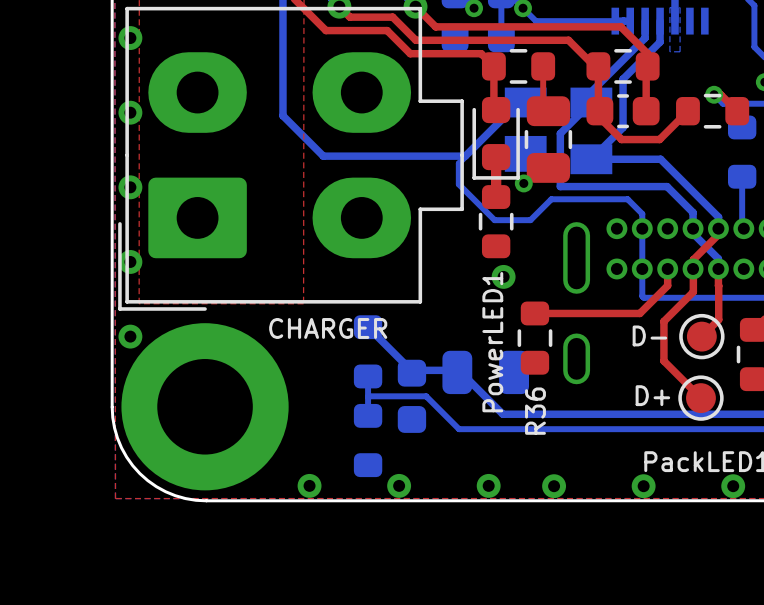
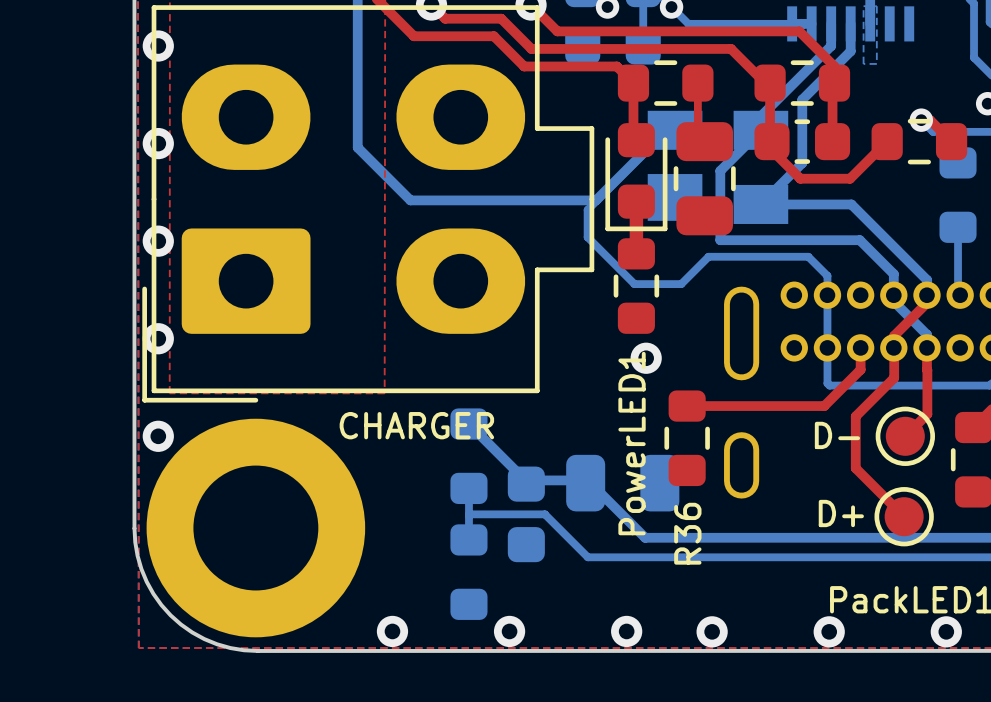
via: (523, 183) -> none

